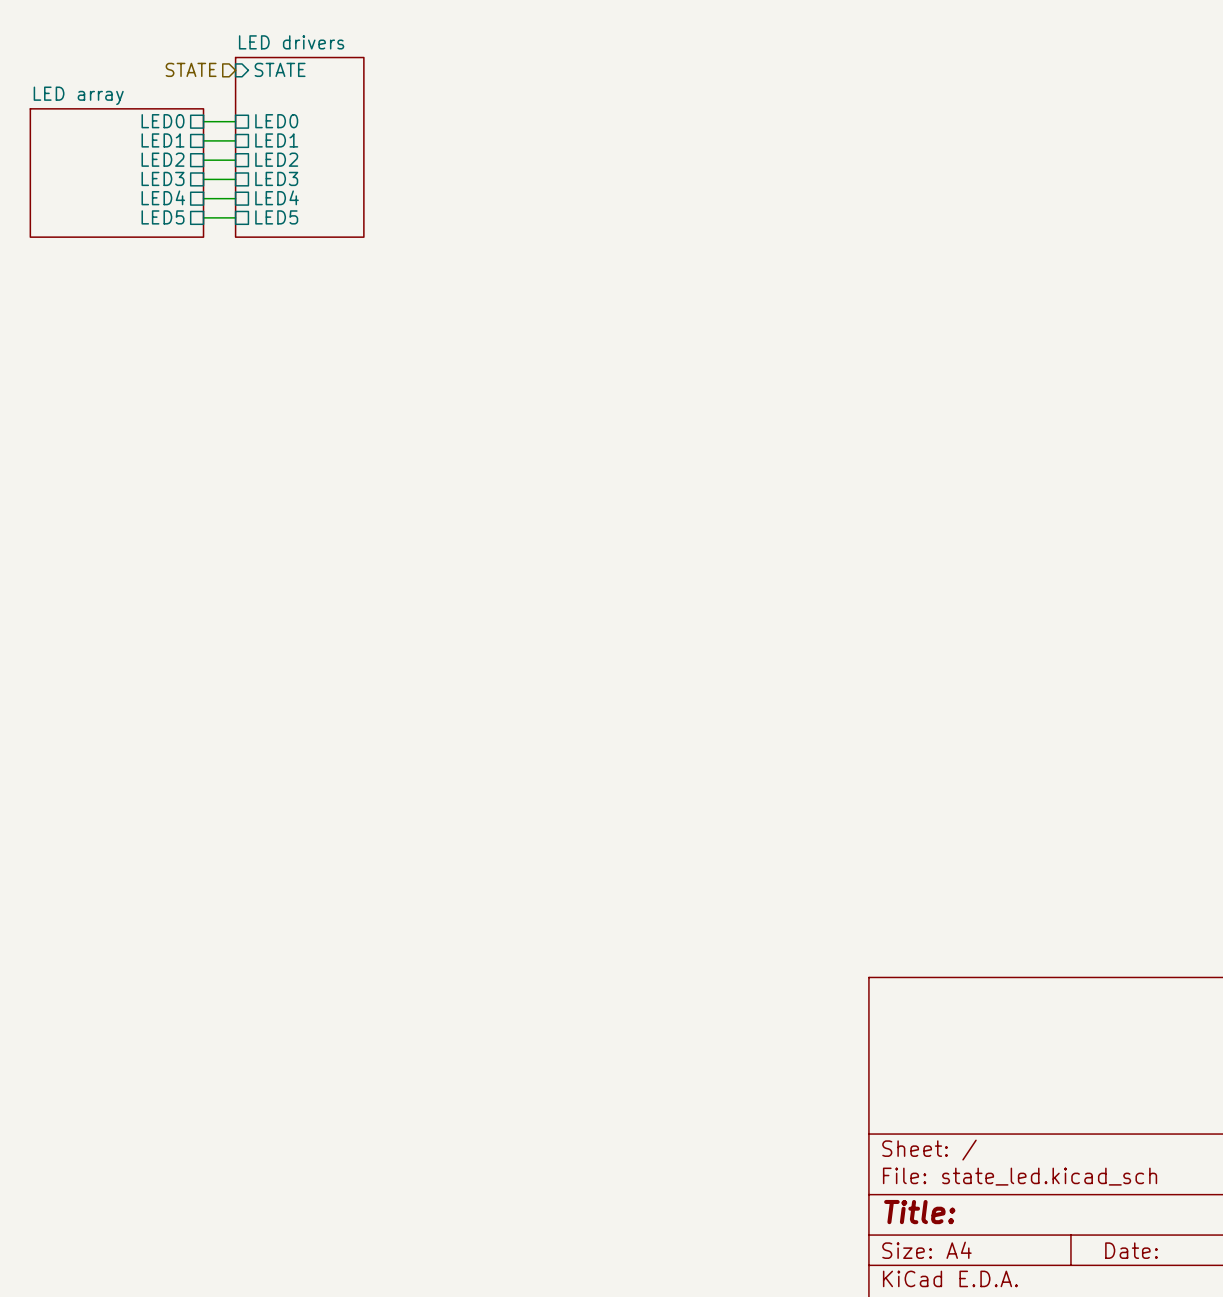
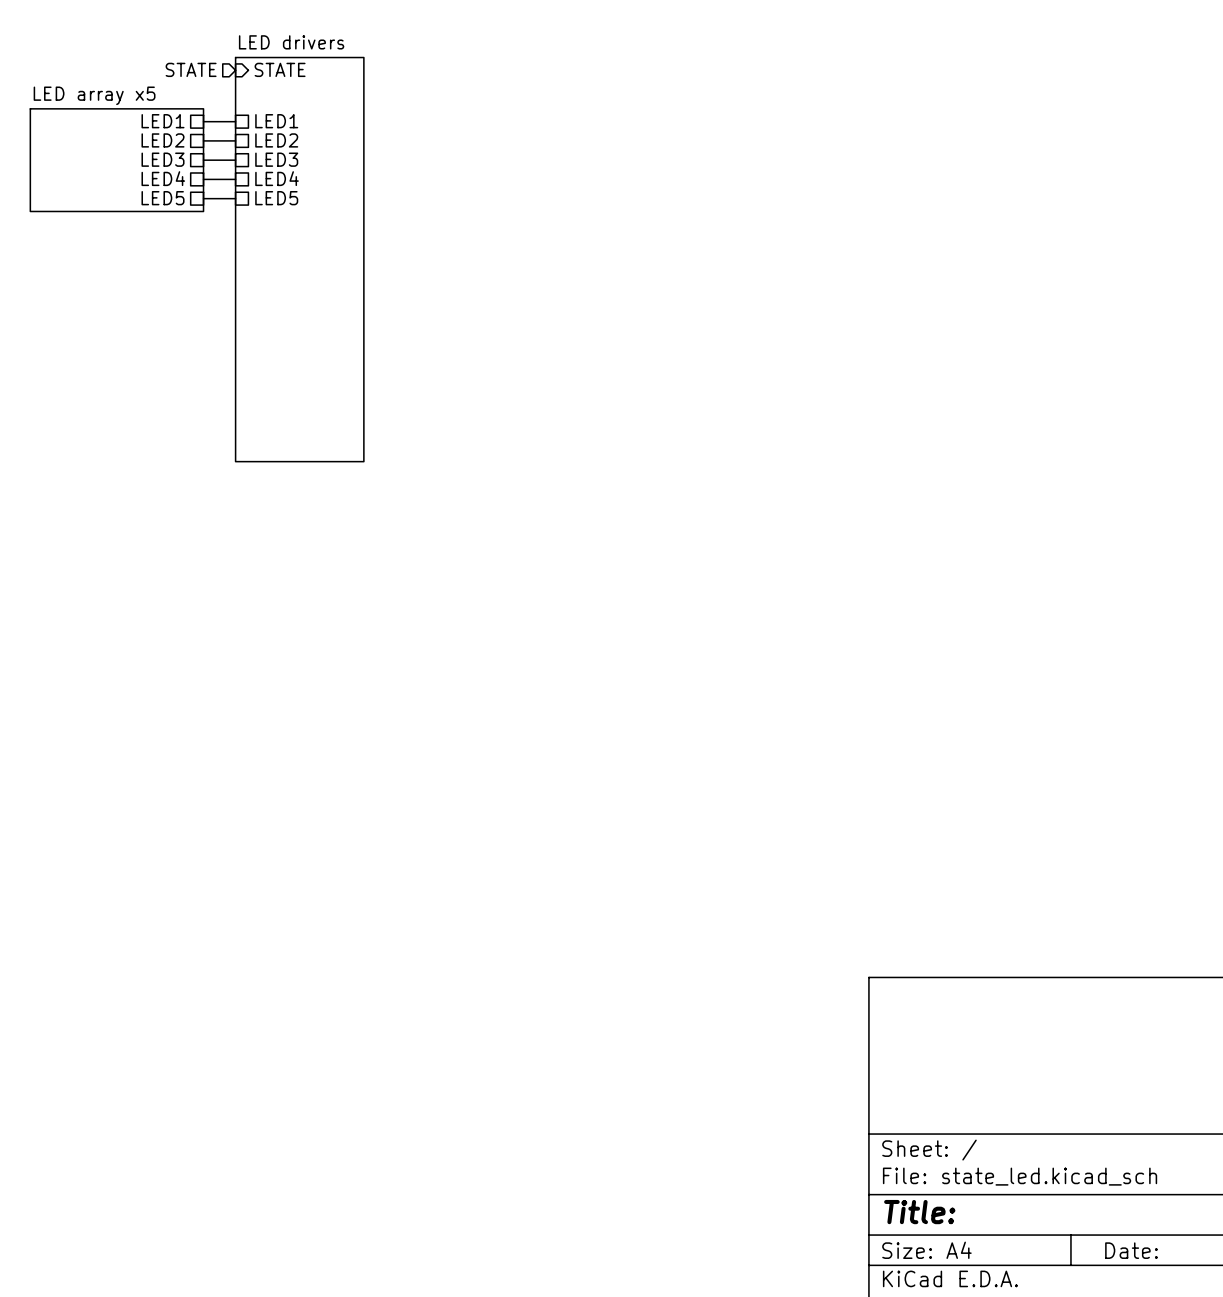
sheet pin: LED0 (163, 121) -> LED1 (163, 121)
sheet pin: LED0 (276, 121) -> LED1 (276, 121)
sheet pin: LED1 (163, 140) -> LED2 (163, 140)
sheet pin: LED1 (276, 140) -> LED2 (276, 140)
sheet LED drivers: (299, 147) -> none
sheet pin: LED2 (163, 159) -> LED3 (163, 159)
sheet pin: LED2 (276, 159) -> LED3 (276, 159)
sheet LED array x5: none -> (116, 160)
sheet LED array: (116, 172) -> none
sheet pin: LED3 (163, 178) -> LED4 (163, 178)
sheet pin: LED3 (276, 178) -> LED4 (277, 178)
sheet pin: LED4 (163, 197) -> LED5 (163, 198)
sheet pin: LED4 (277, 197) -> LED5 (276, 198)
sheet pin: LED5 (163, 217) -> none
wire: (203, 217) (235, 217) -> none
sheet pin: LED5 (276, 217) -> none
sheet LED drivers: none -> (299, 259)

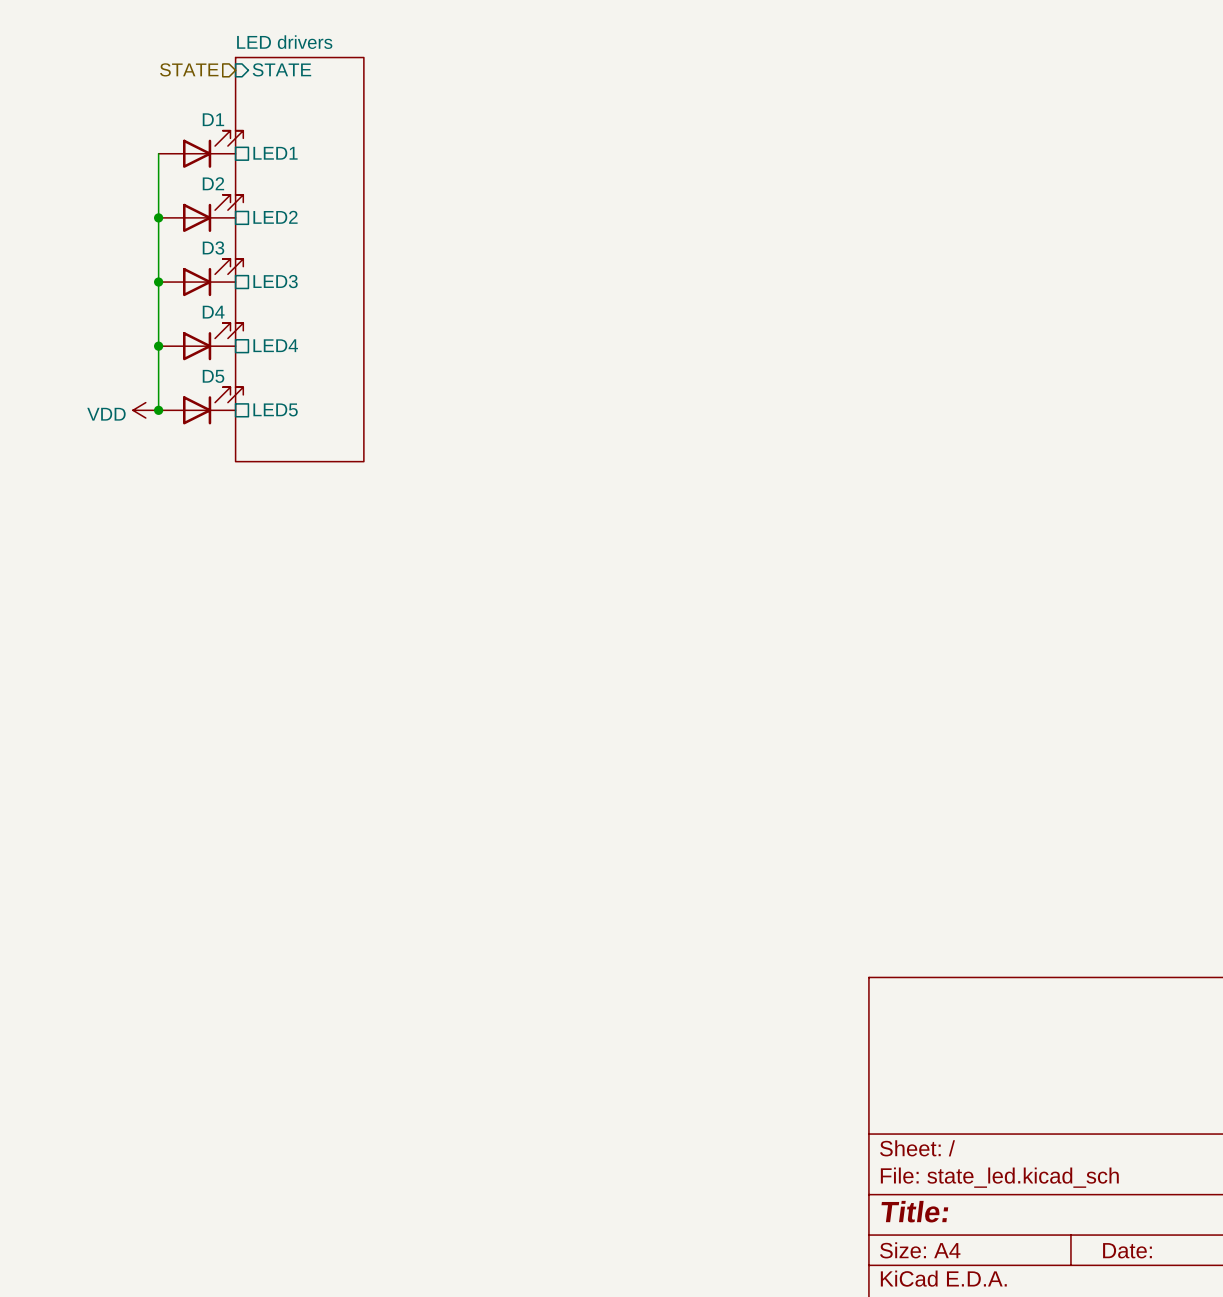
sheet pin: LED1 (163, 121) -> none
wire: (203, 121) (235, 121) -> none
sheet pin position: LED1 (276, 121) -> LED1 (275, 153)
sheet pin: LED2 (163, 140) -> none
wire: (203, 140) (235, 140) -> none
sheet pin: LED2 (276, 140) -> none
D1: none -> (200, 149)
wire: none -> (158, 153) (158, 410)
sheet pin: LED3 (163, 159) -> none
sheet pin: LED3 (276, 159) -> none
sheet LED array x5: (116, 160) -> none
wire: (203, 160) (235, 160) -> none
sheet pin: LED4 (163, 178) -> none
sheet pin: LED4 (277, 178) -> none
wire: (203, 179) (235, 179) -> none
sheet pin: LED5 (163, 198) -> none
wire: (203, 198) (235, 198) -> none
sheet pin: LED5 (276, 198) -> LED2 (275, 217)
D2: none -> (200, 213)
junction: none -> (158, 217)
D3: none -> (200, 277)
sheet pin: none -> LED3 (275, 281)
junction: none -> (158, 282)
D4: none -> (200, 341)
sheet pin: none -> LED4 (275, 345)
junction: none -> (158, 346)
D5: none -> (200, 405)
sheet pin: none -> LED5 (275, 409)
power symbol: none -> VDD (145, 410)
junction: none -> (158, 410)

